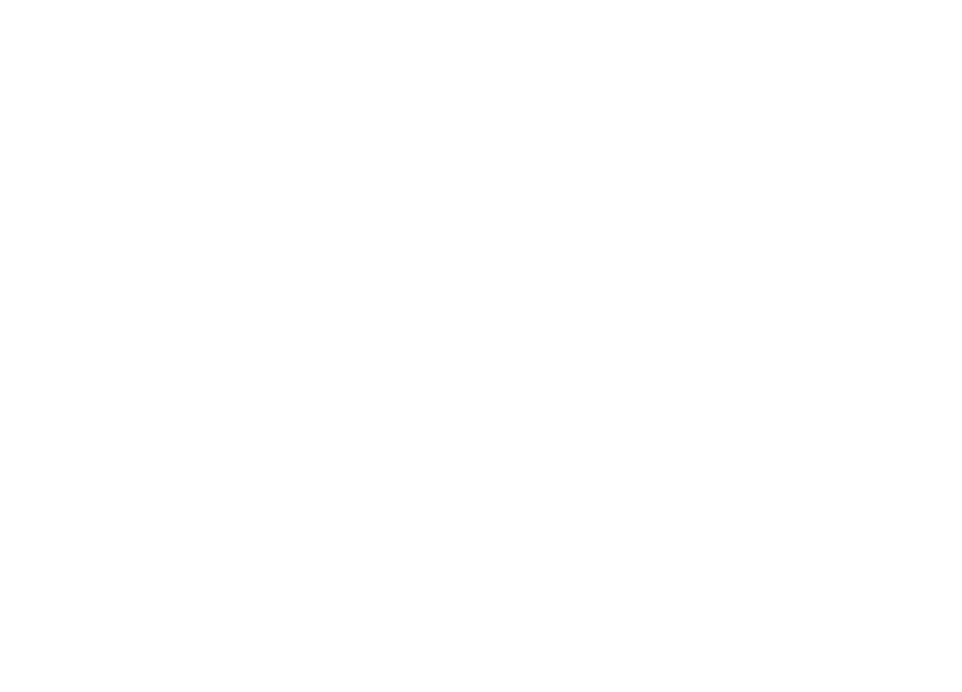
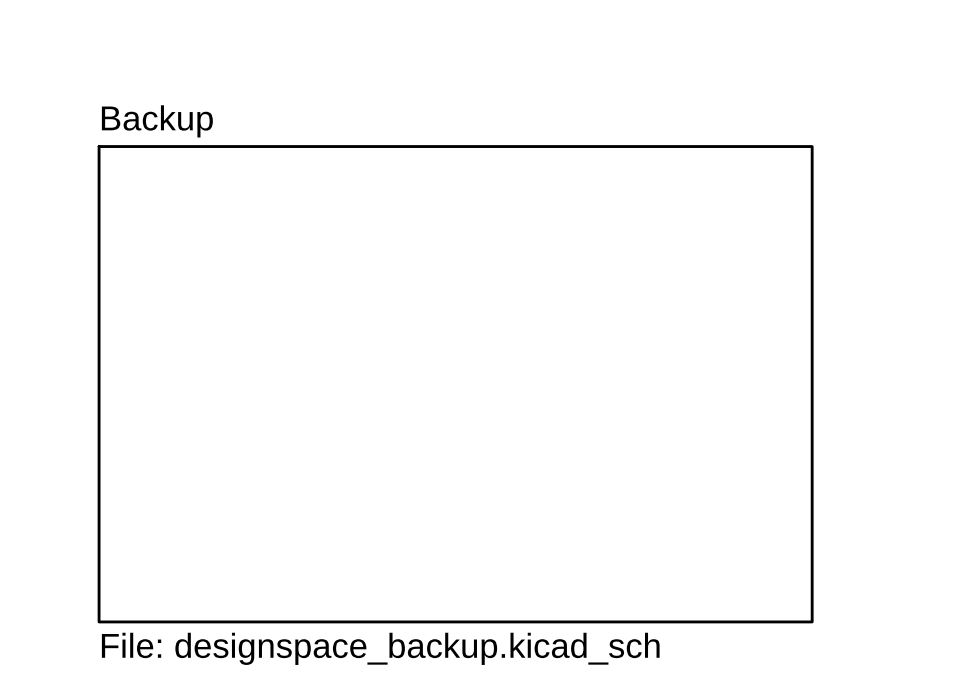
sheet Backup: none -> File: designspace_backup.kicad_sch (455, 384)

